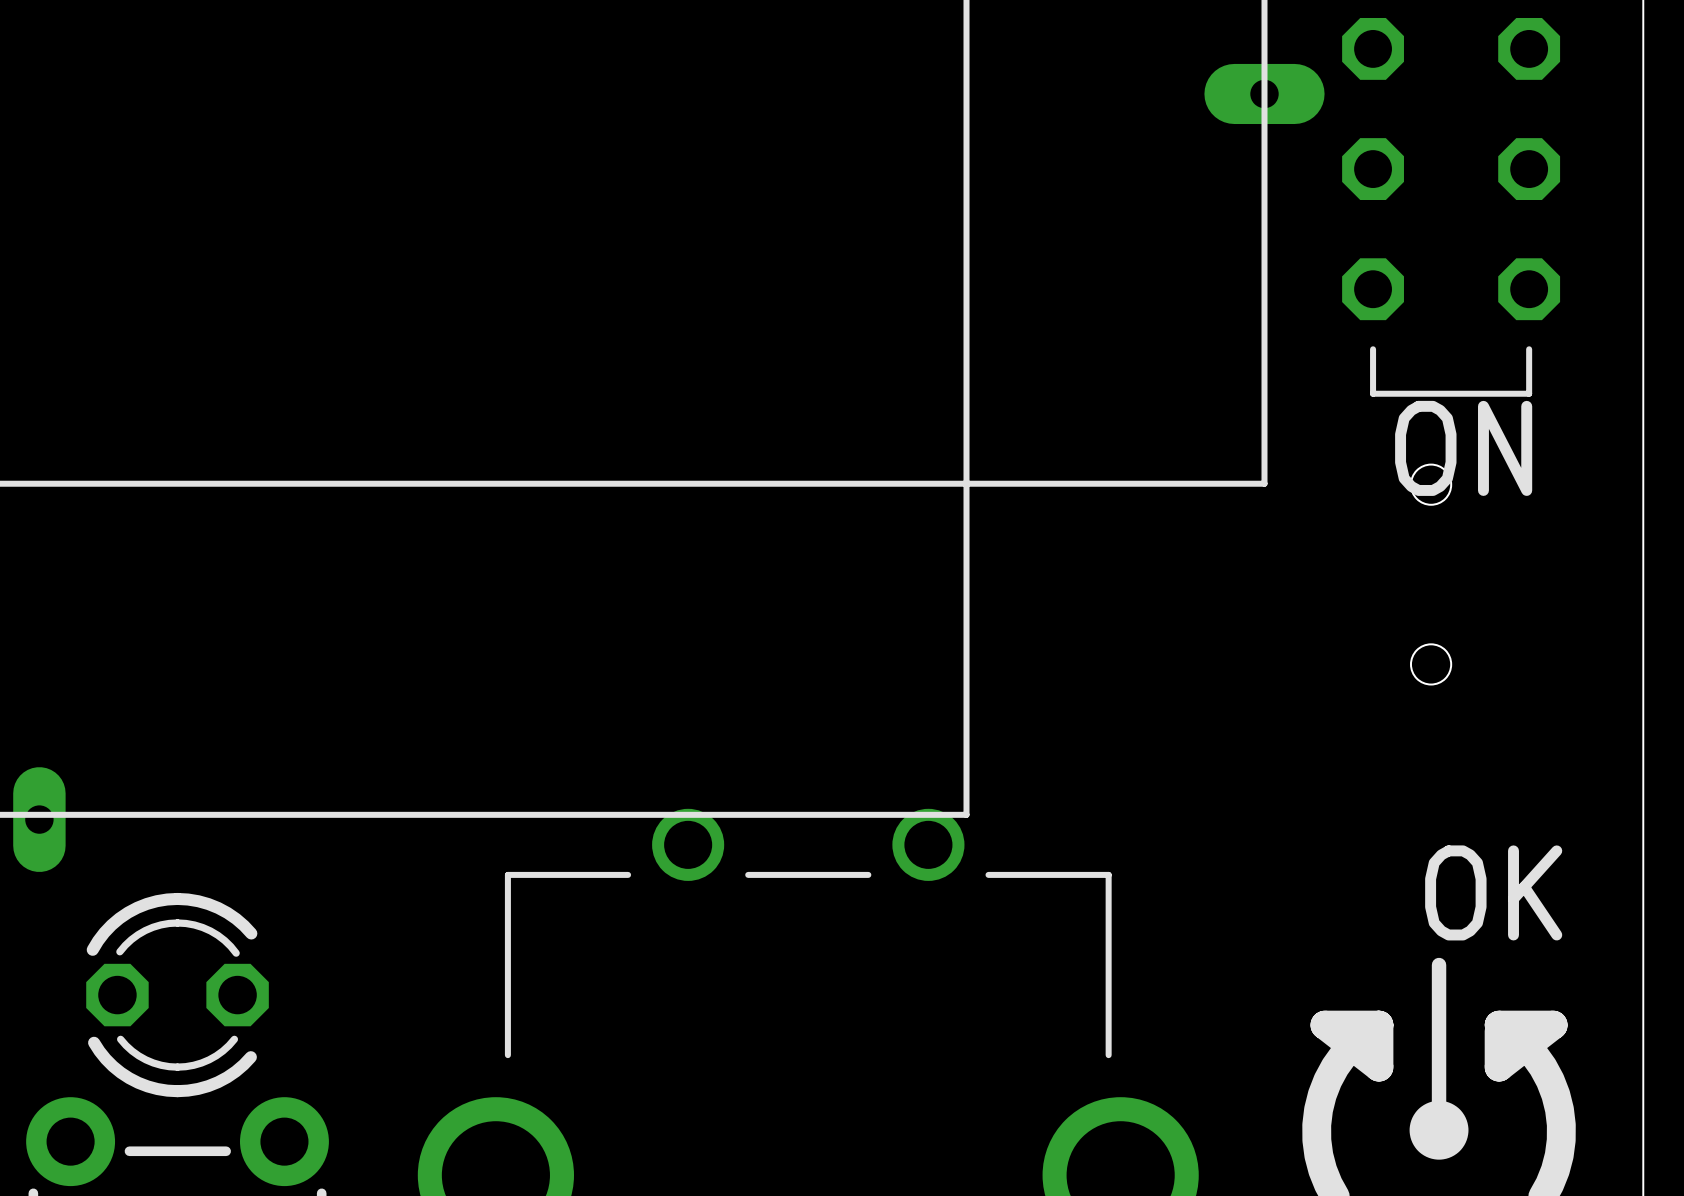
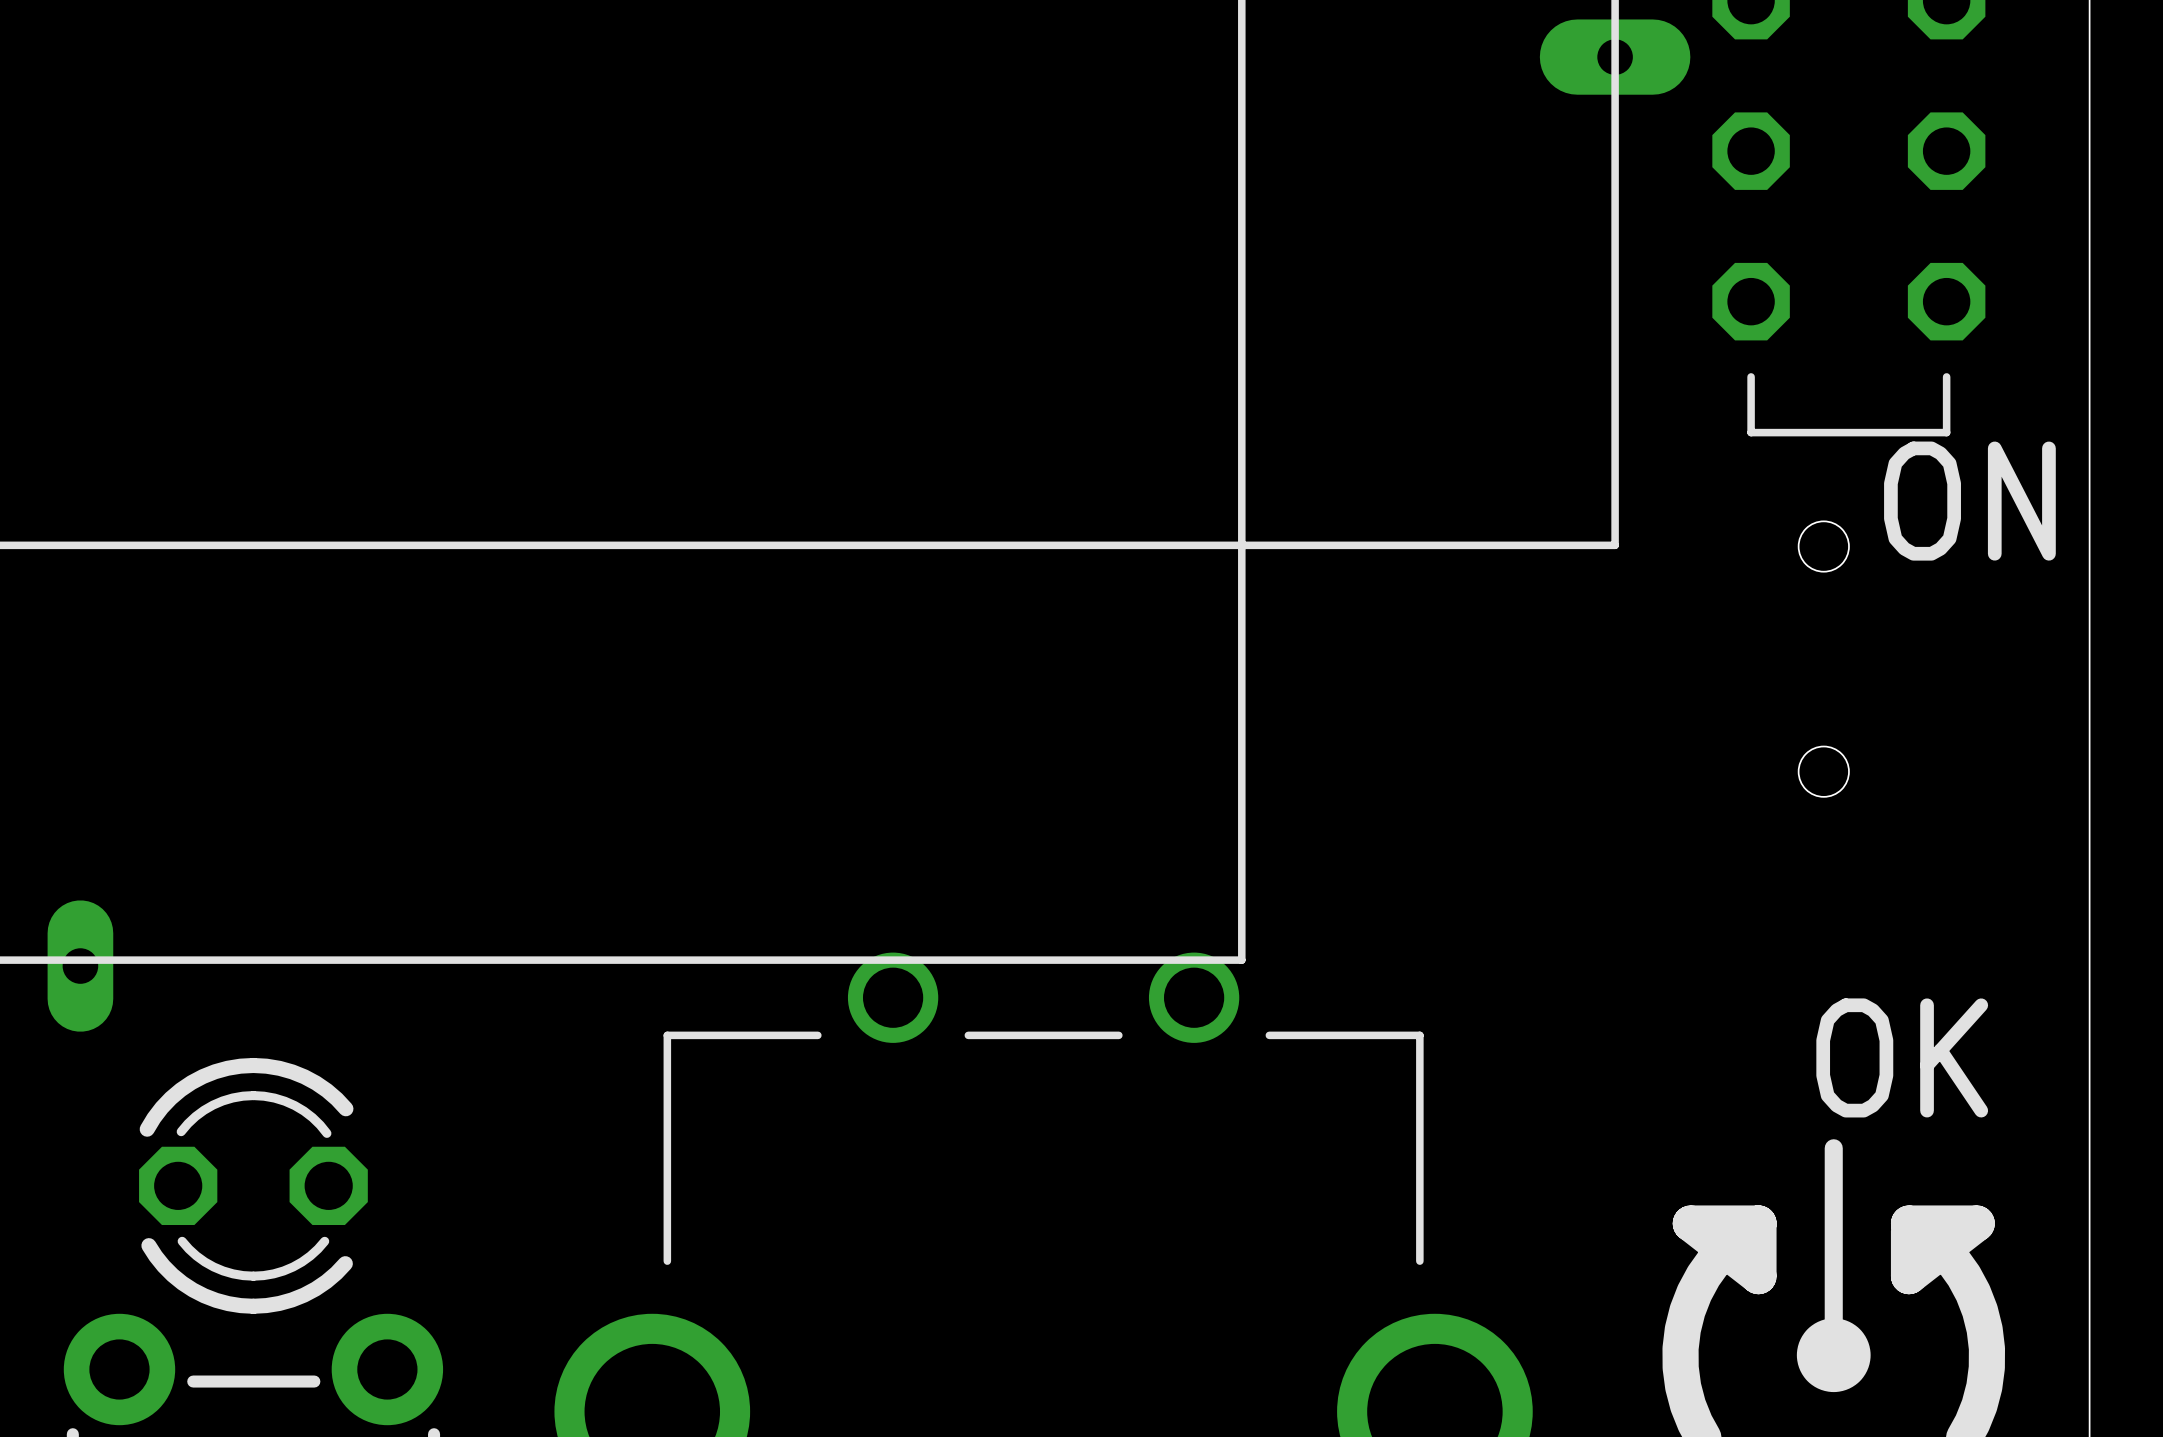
text position: ON (1463, 448) -> ON (1969, 501)

